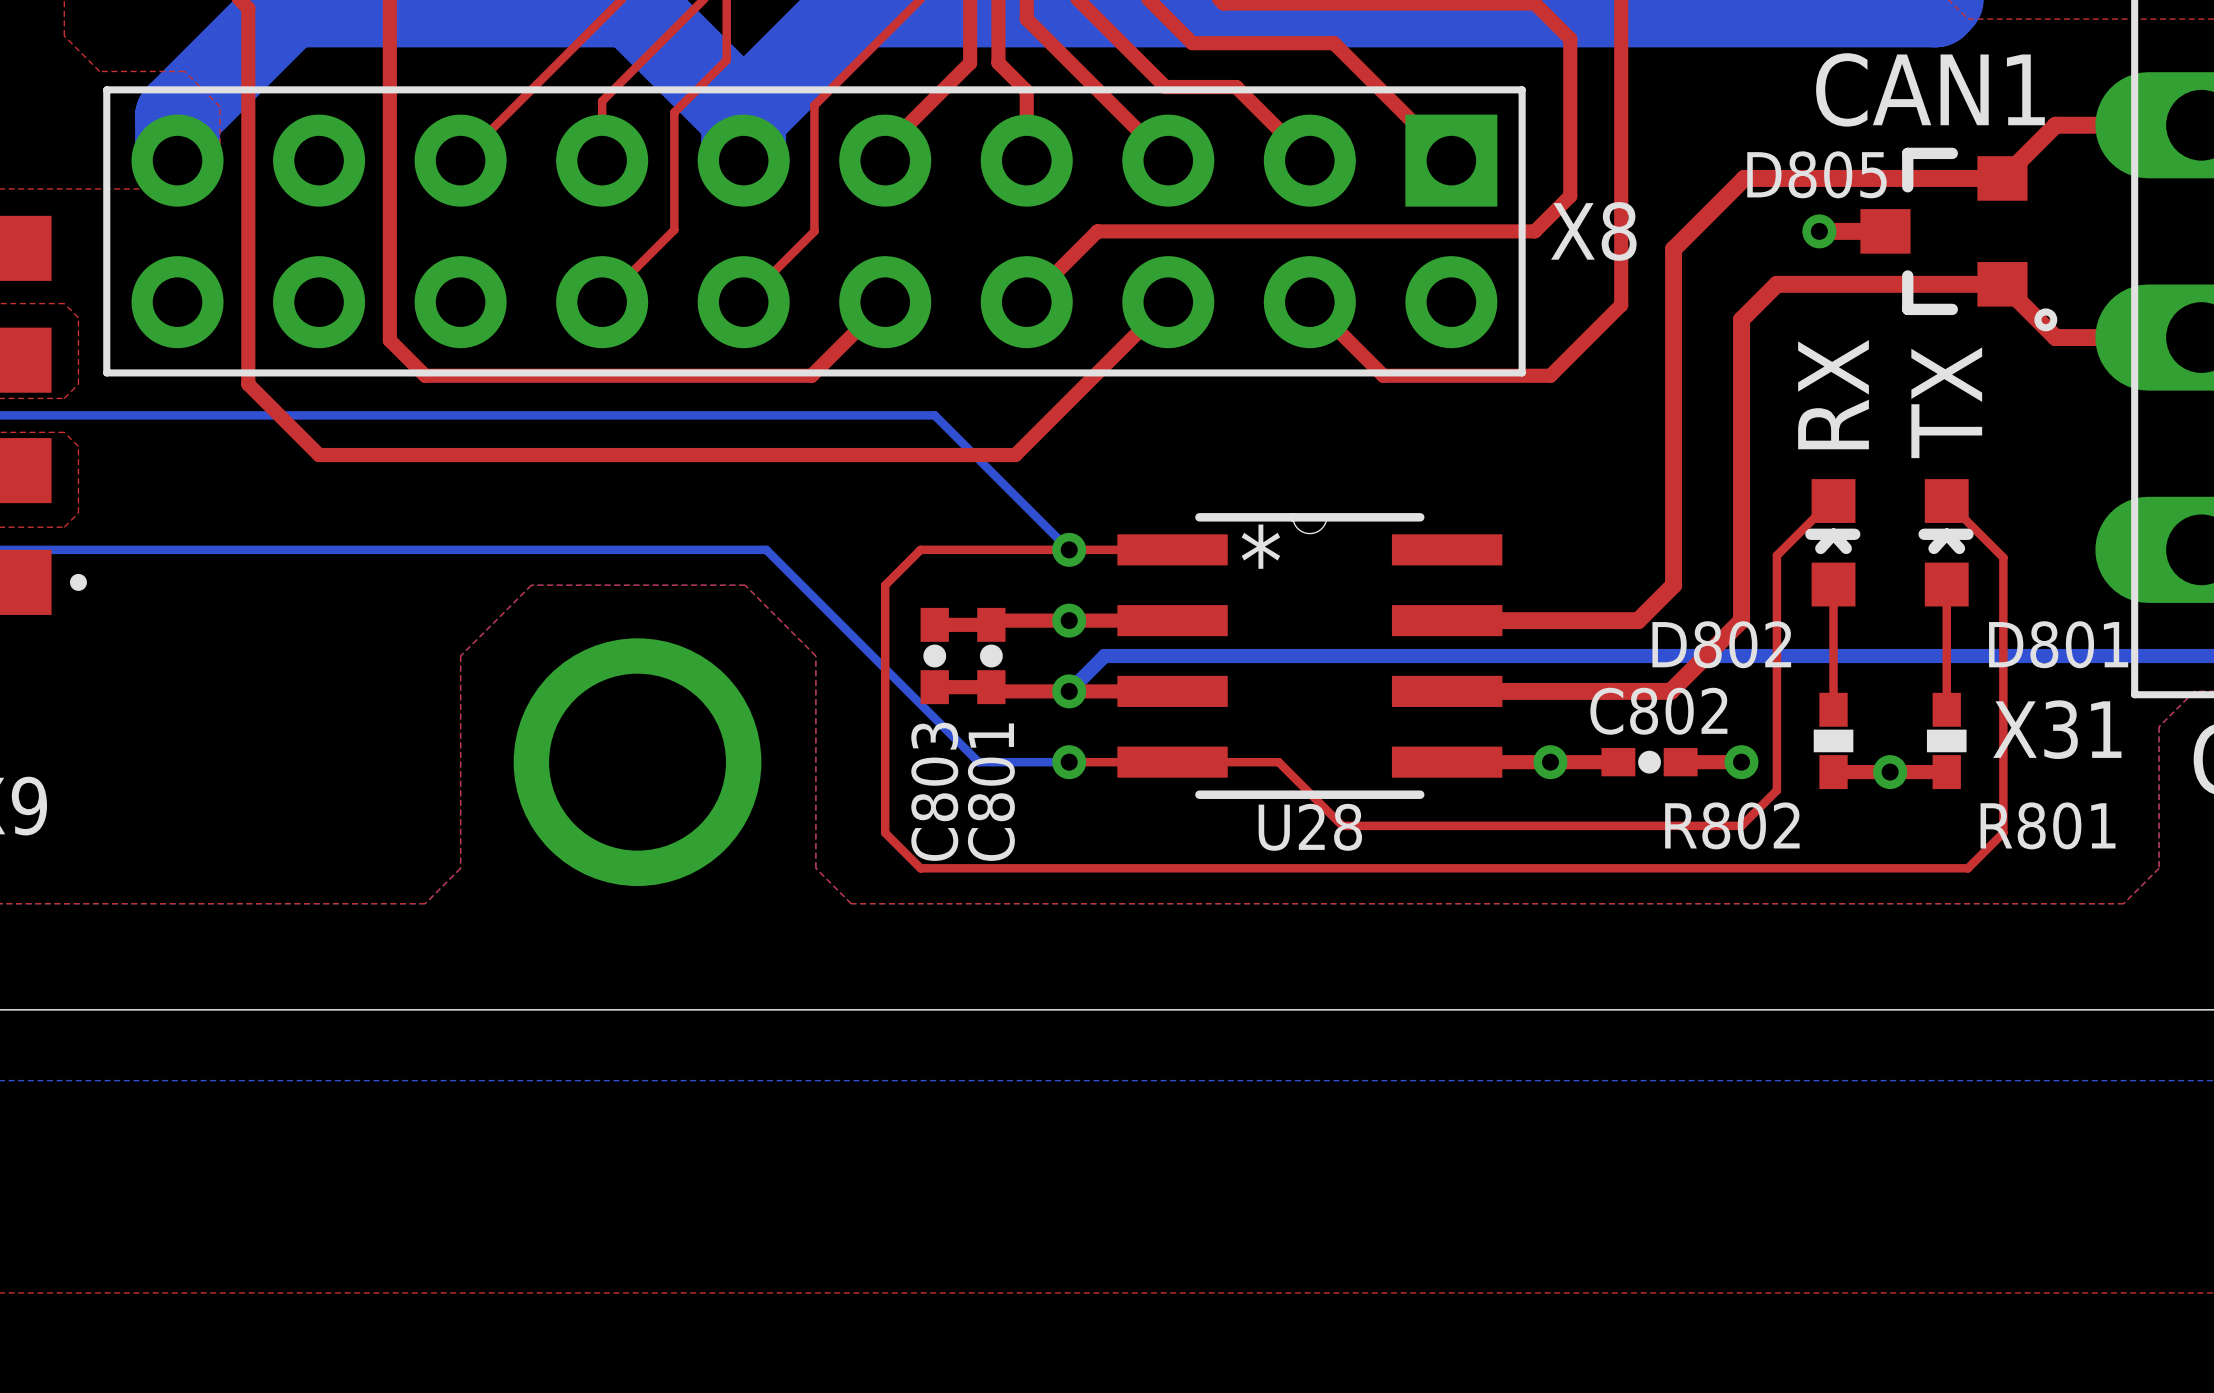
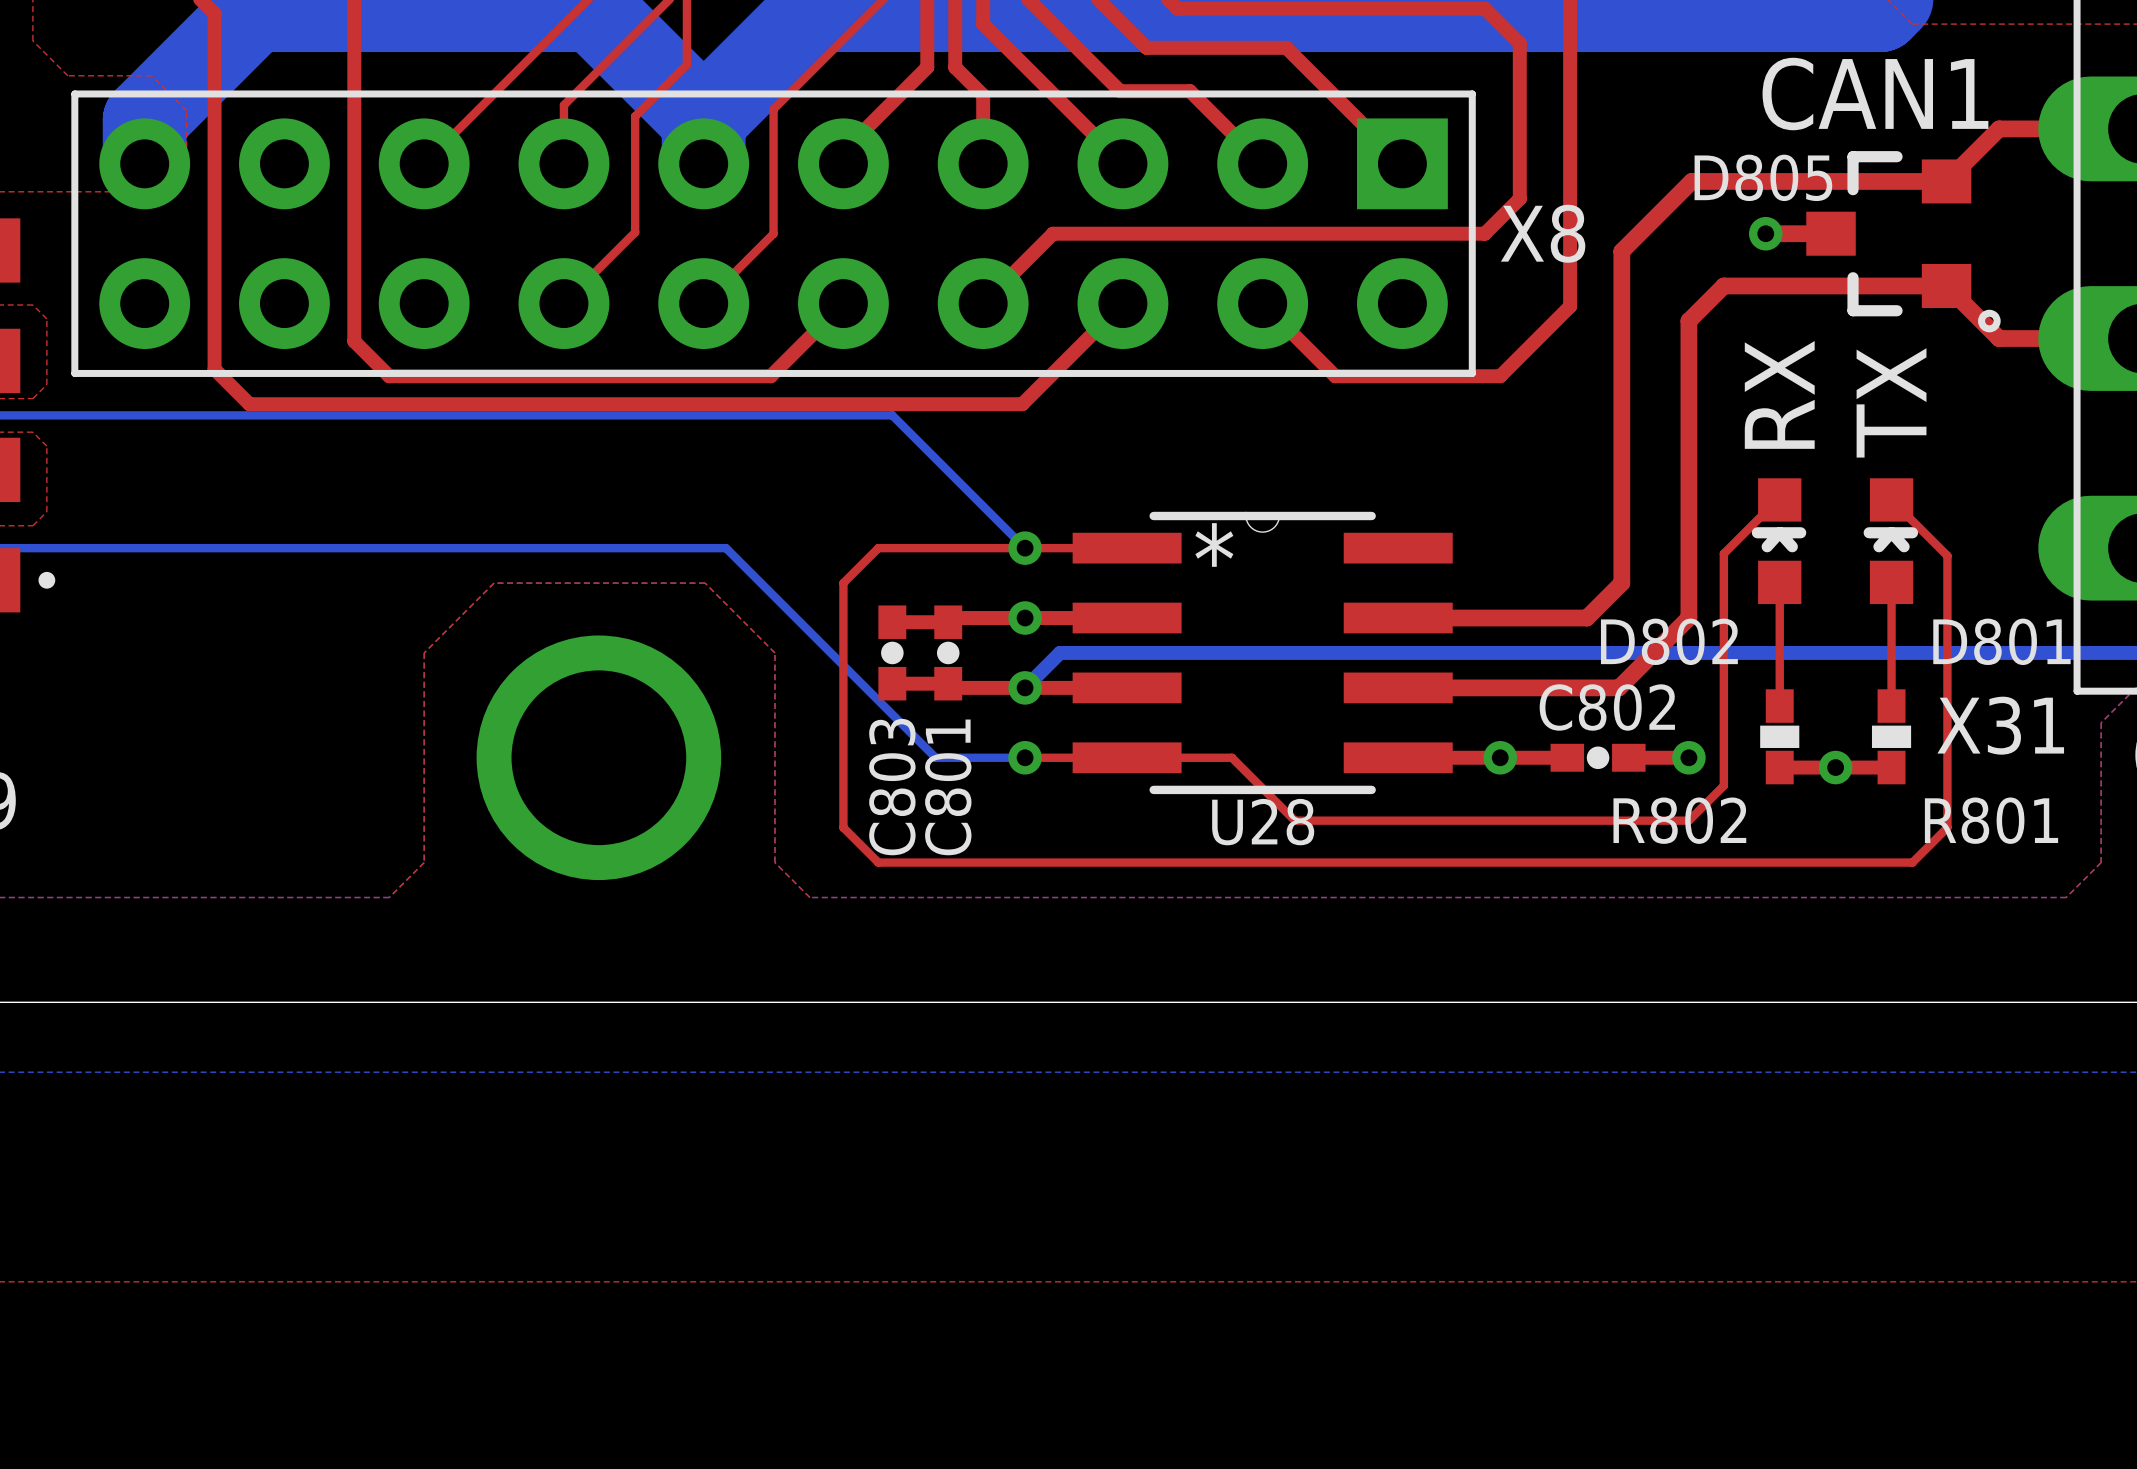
top track: (248, 368) (248, 384) (319, 455) (1015, 455) (1066, 404) -> (214, 369) (249, 404) (1022, 404)

